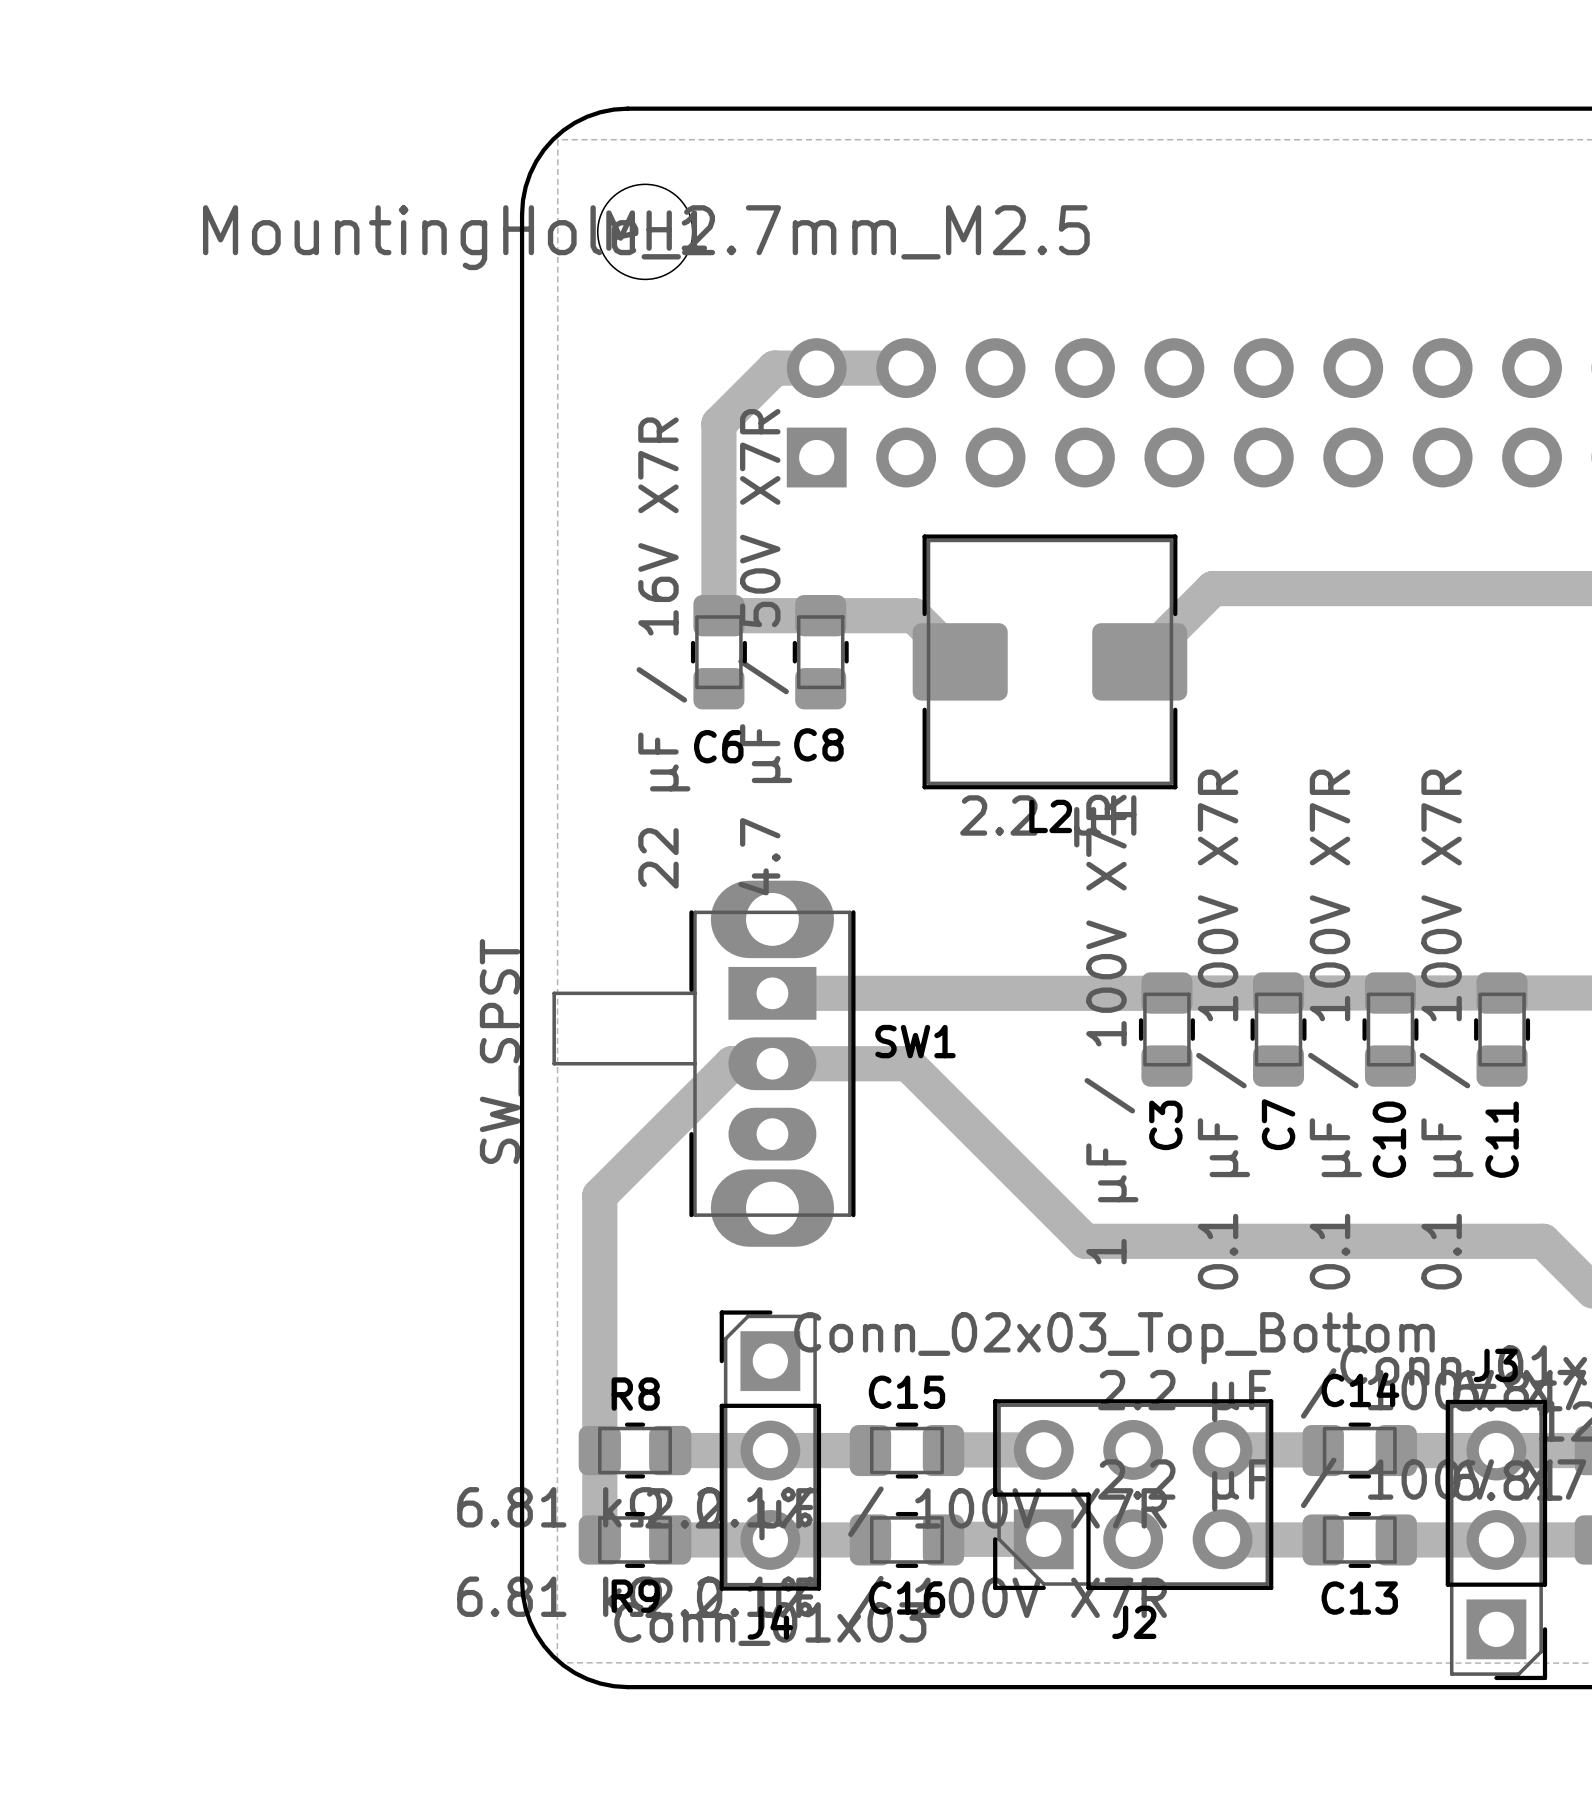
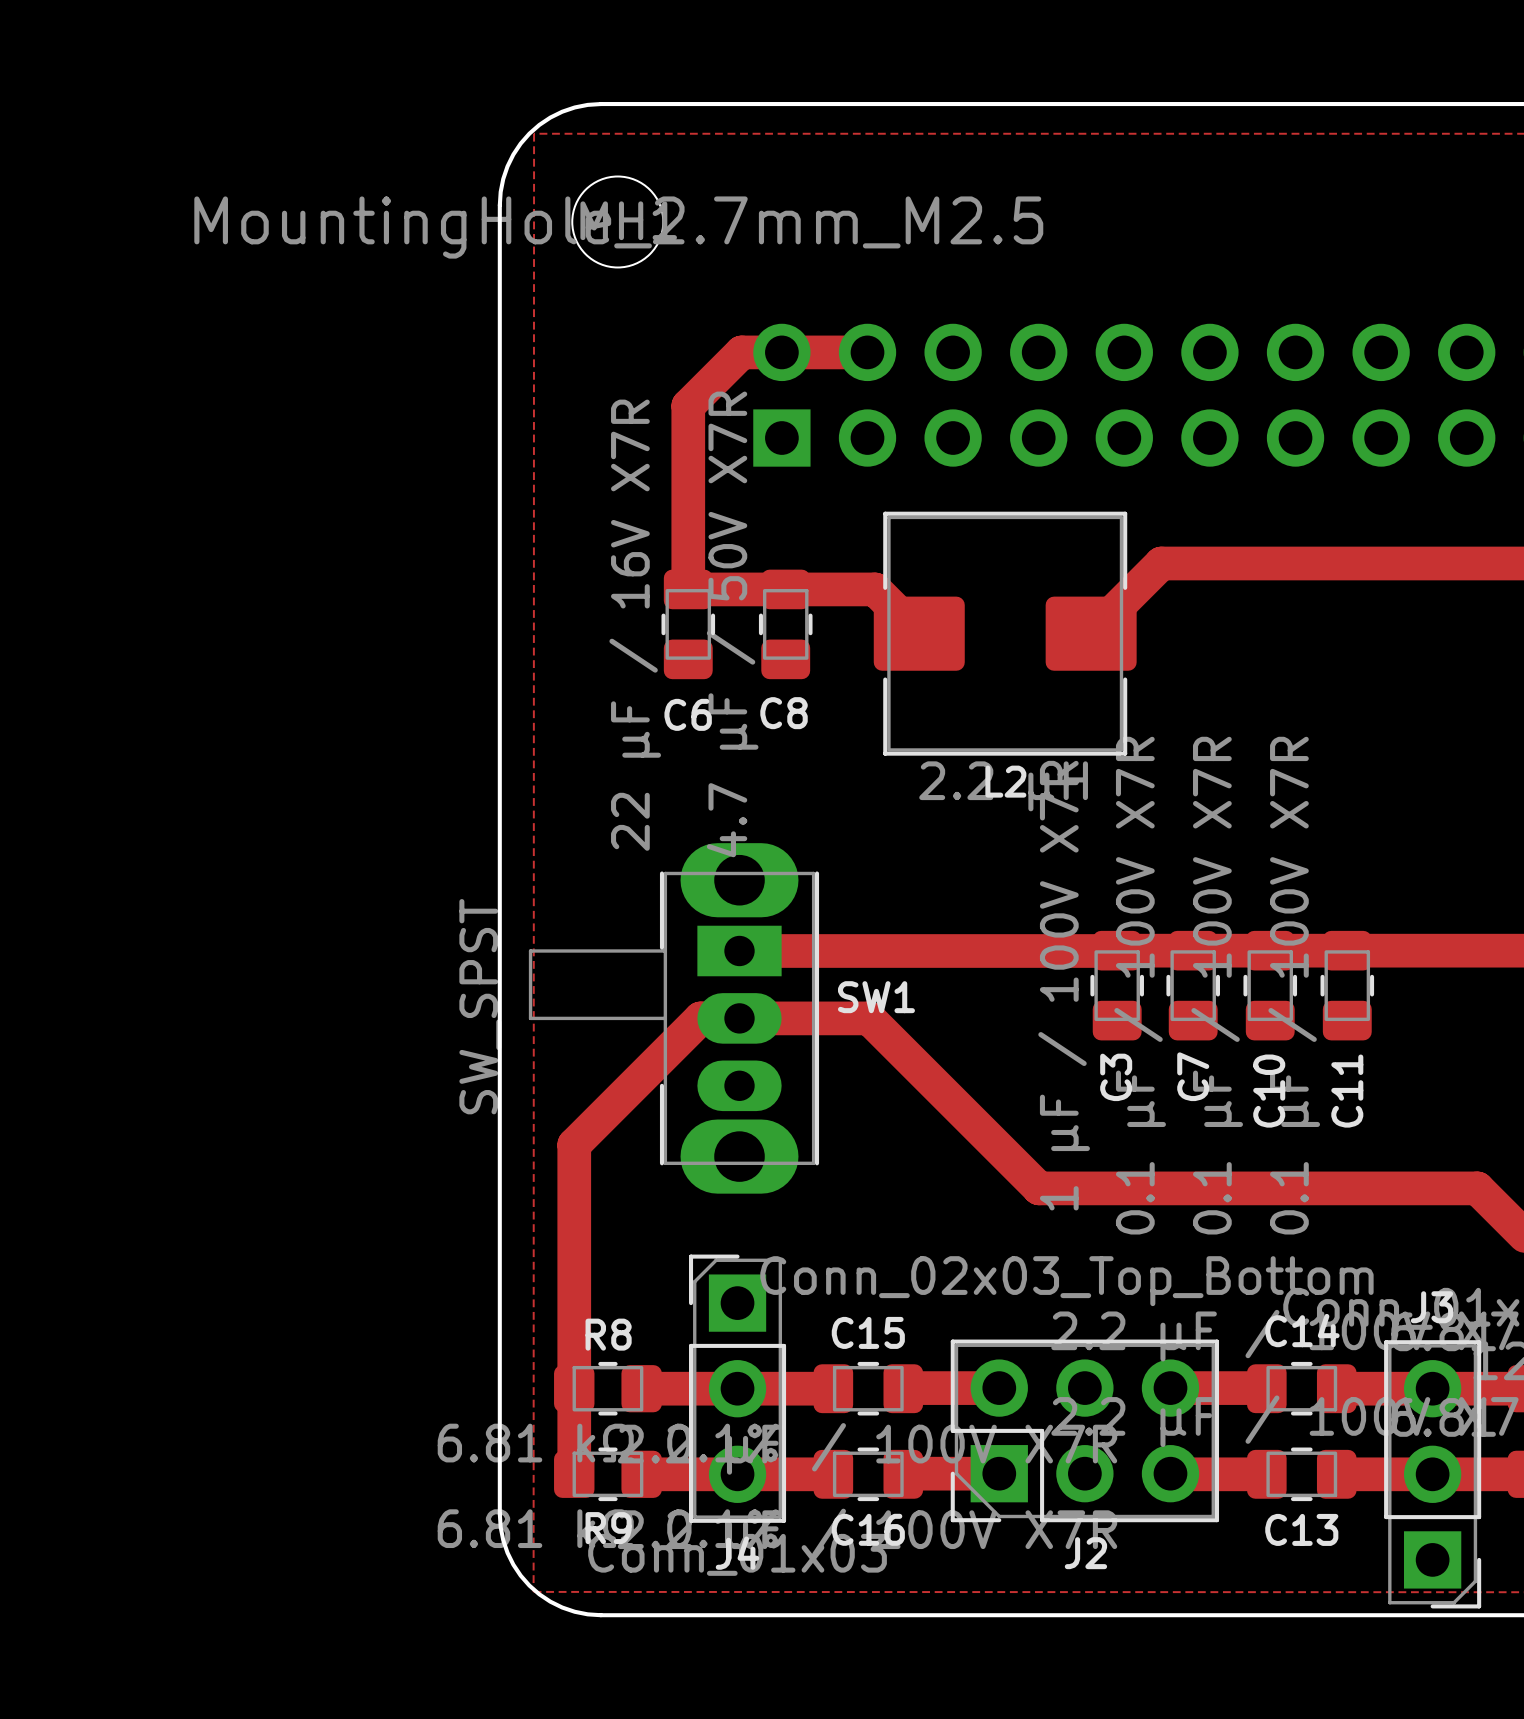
C7 position: (1278, 1029) -> (1193, 985)
C10 position: (1390, 1029) -> (1270, 985)
C11 position: (1502, 1029) -> (1347, 985)

